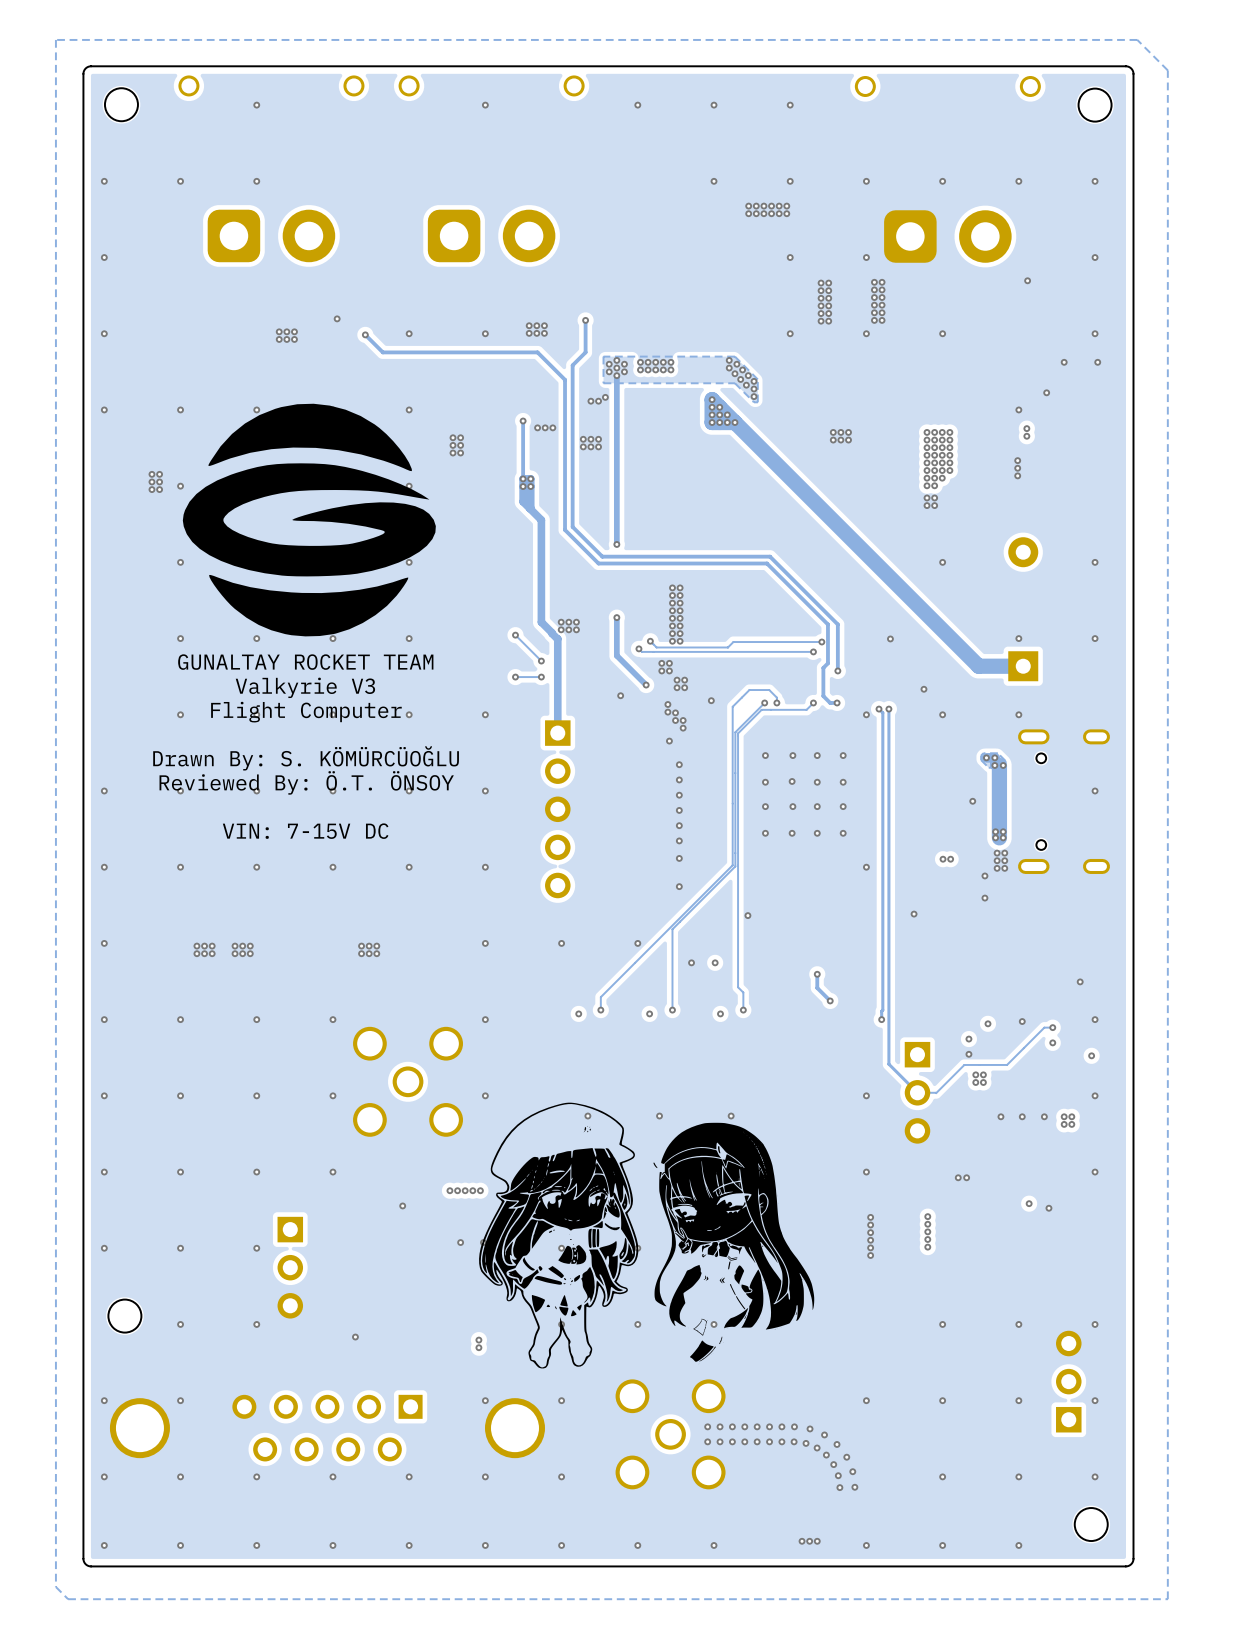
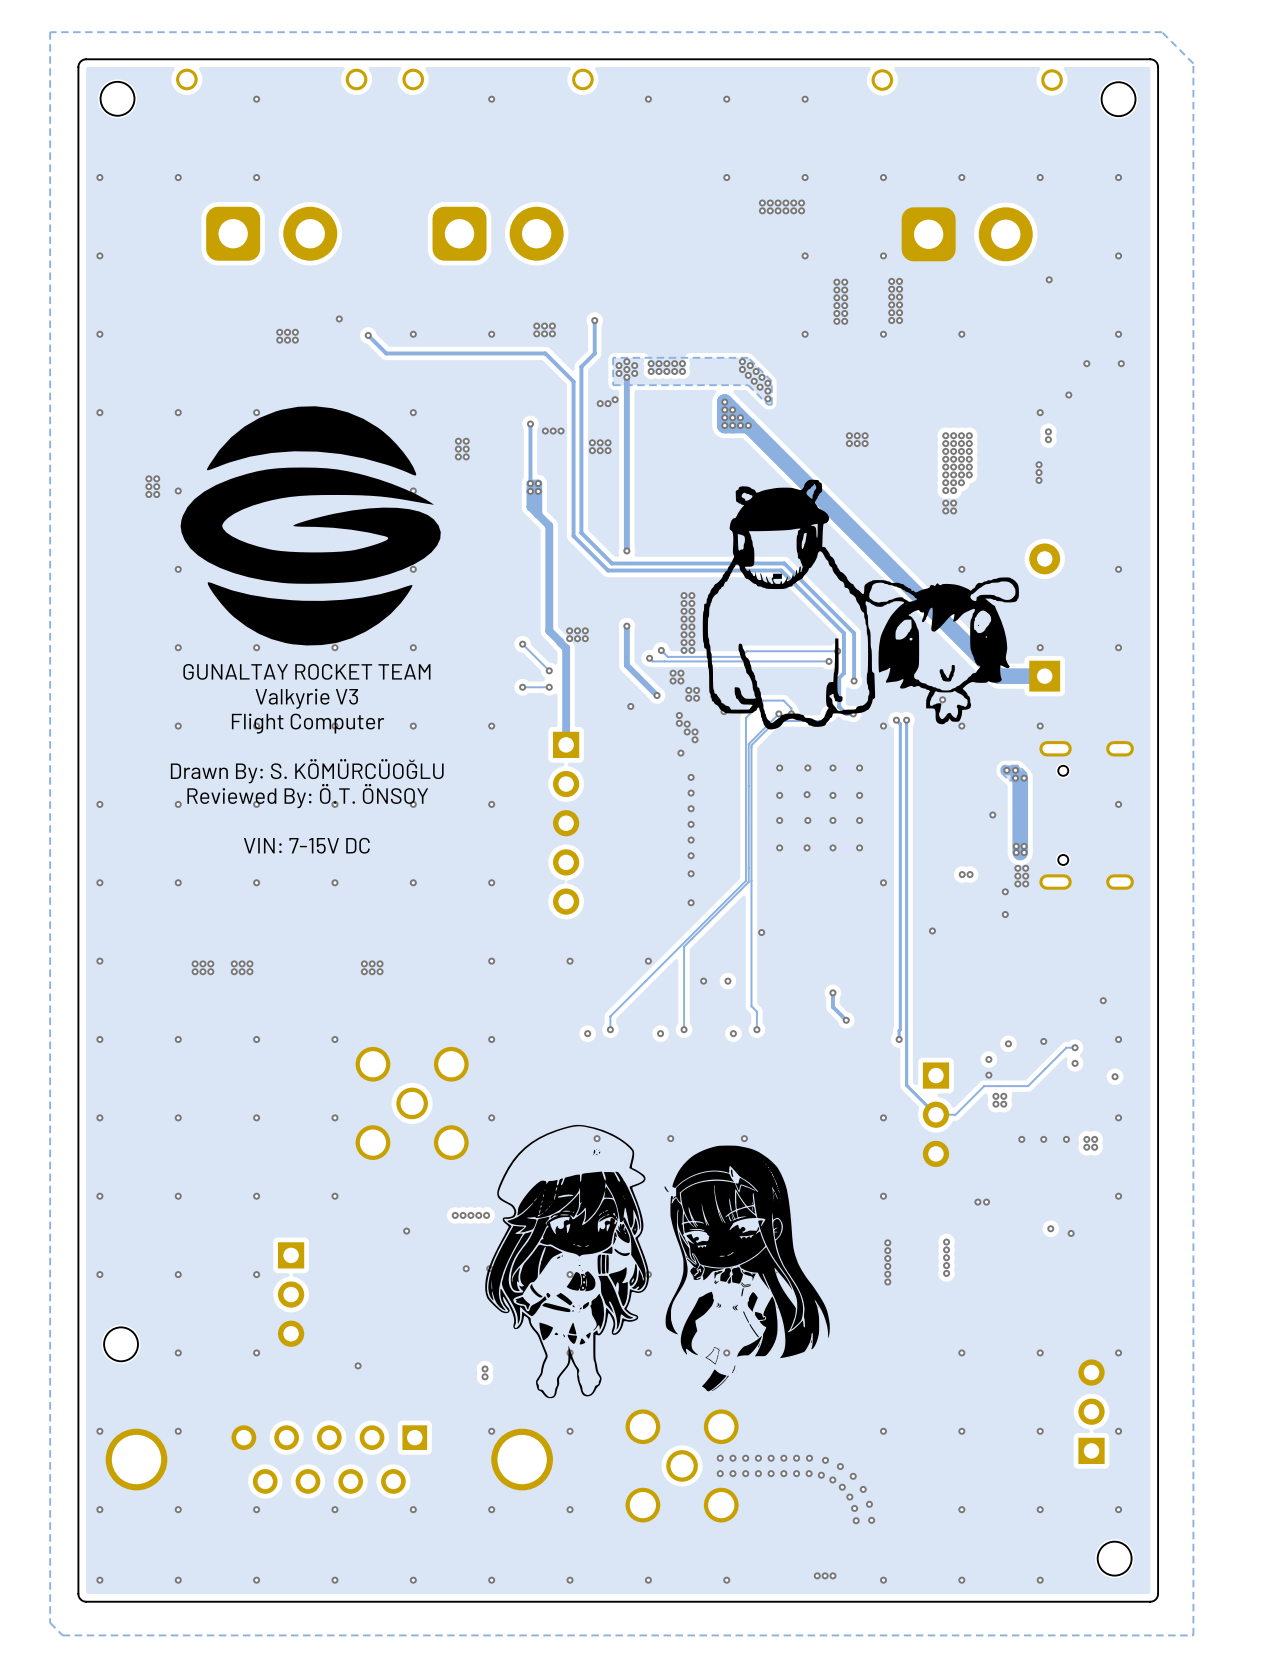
drawing: none -> [702, 479, 1019, 730]

